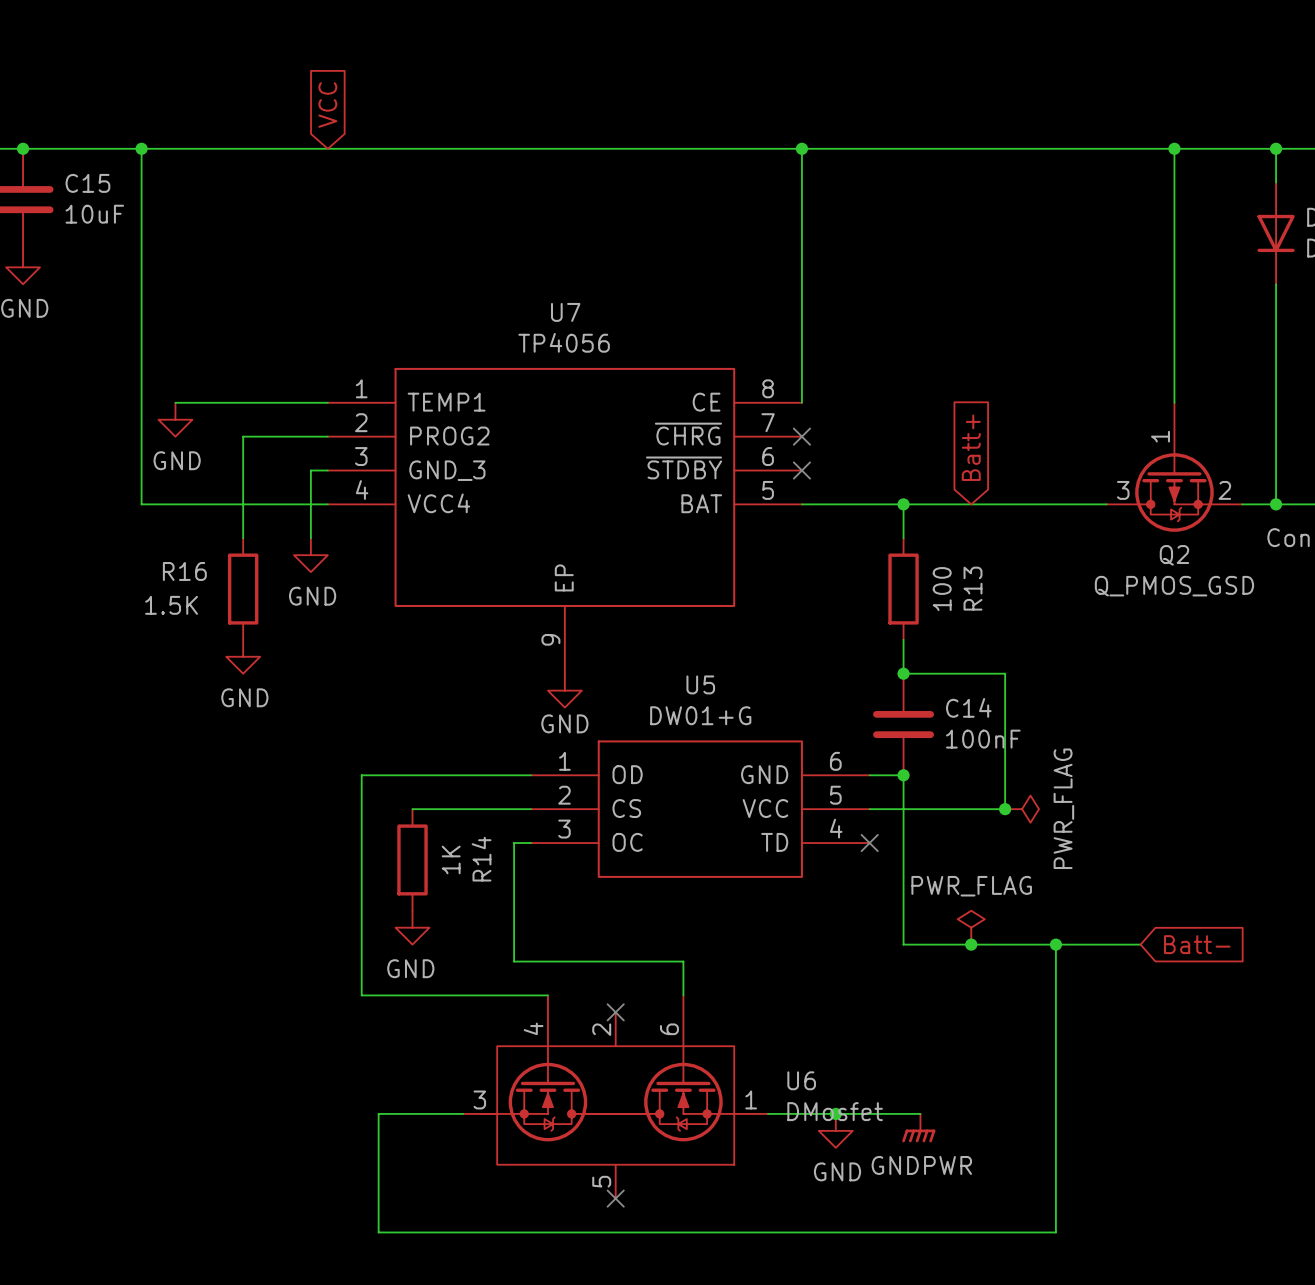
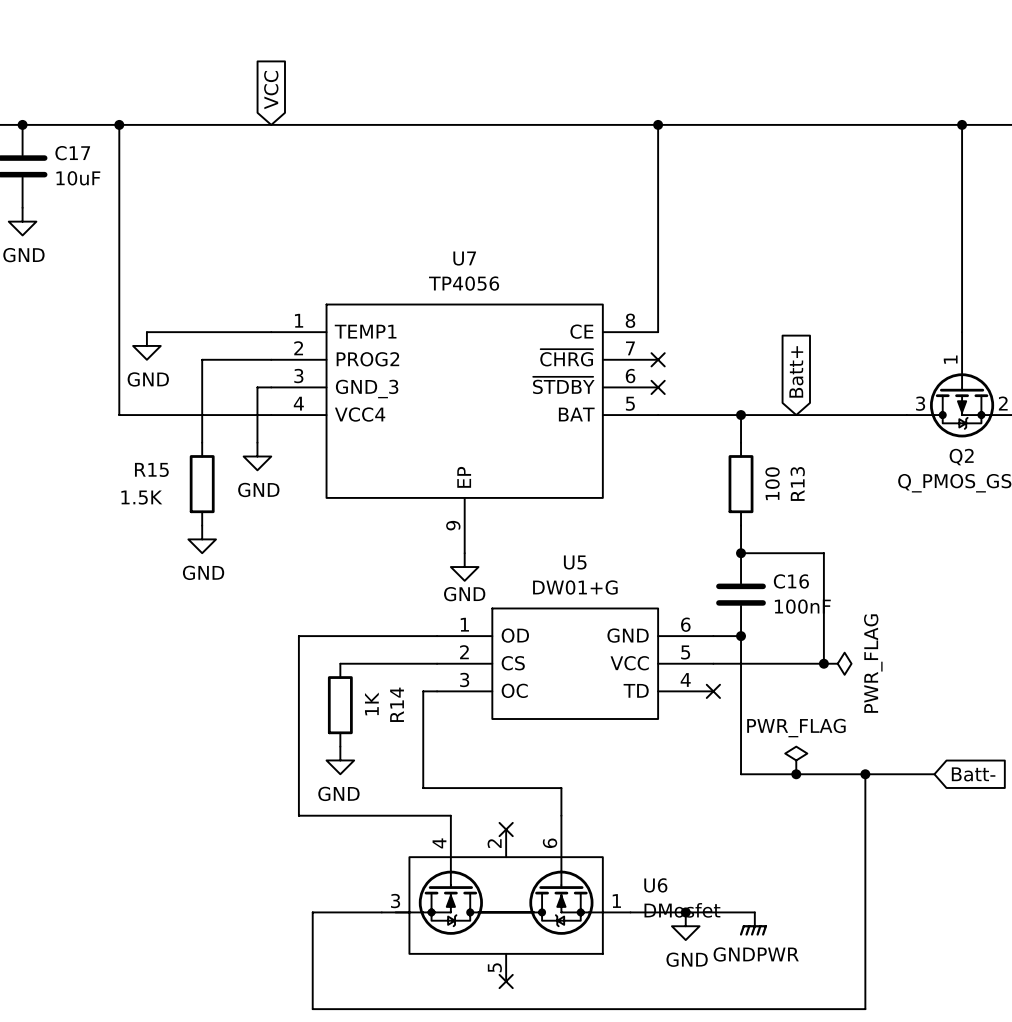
C15 name: C15 (87, 183) -> C17 (72, 153)
R16 name: R16 (184, 571) -> R15 (151, 469)
C14 name: C14 (968, 707) -> C16 (791, 581)

